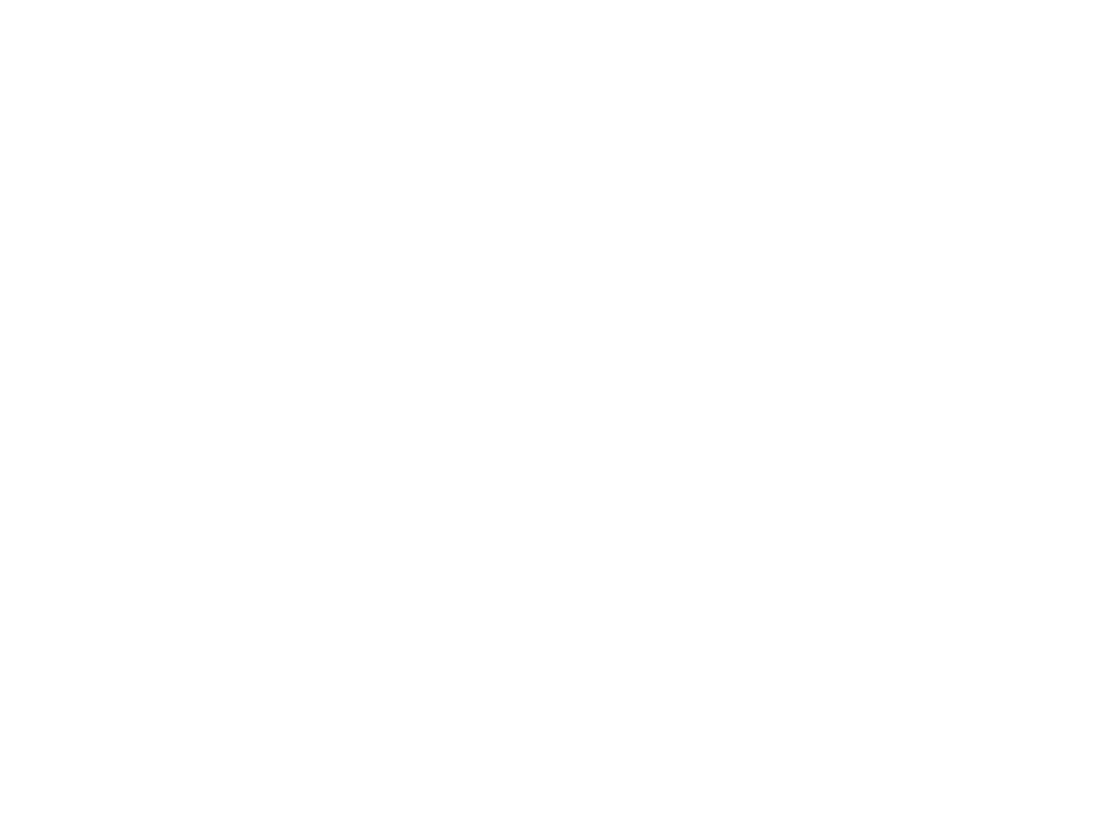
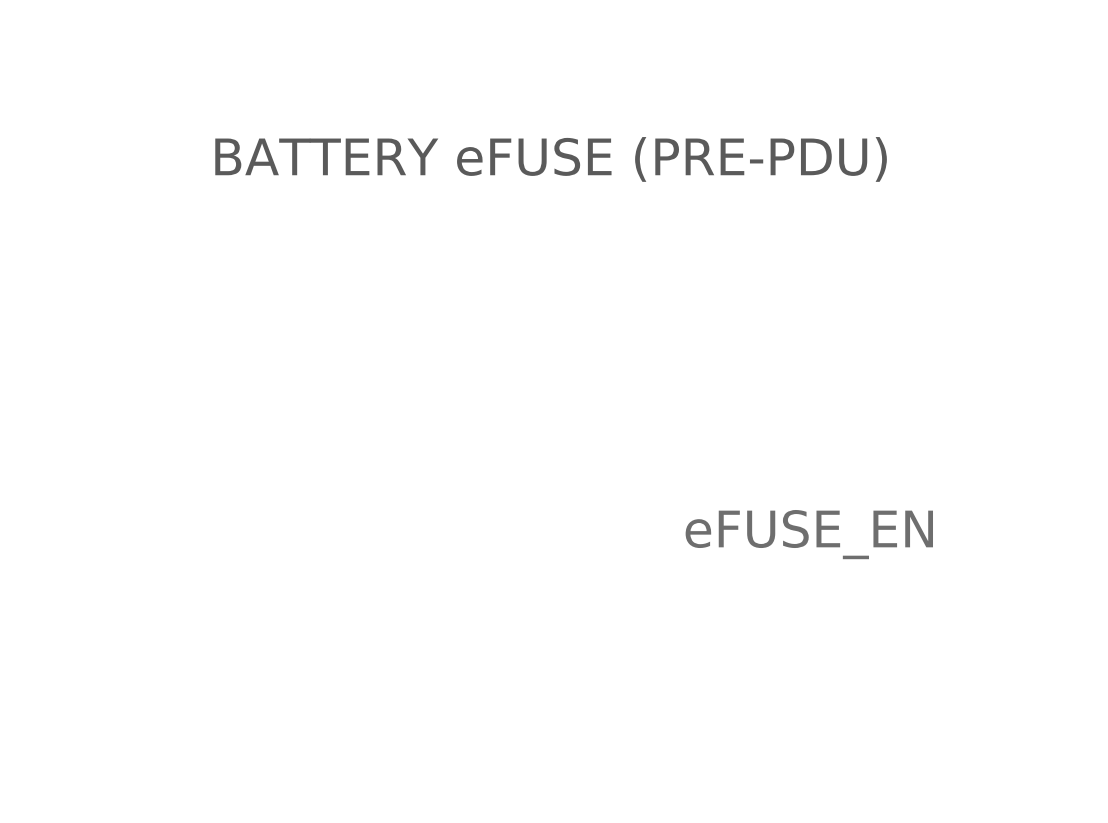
text: none -> BATTERY eFUSE (PRE-PDU) (551, 159)
label: none -> eFUSE_EN (809, 534)

